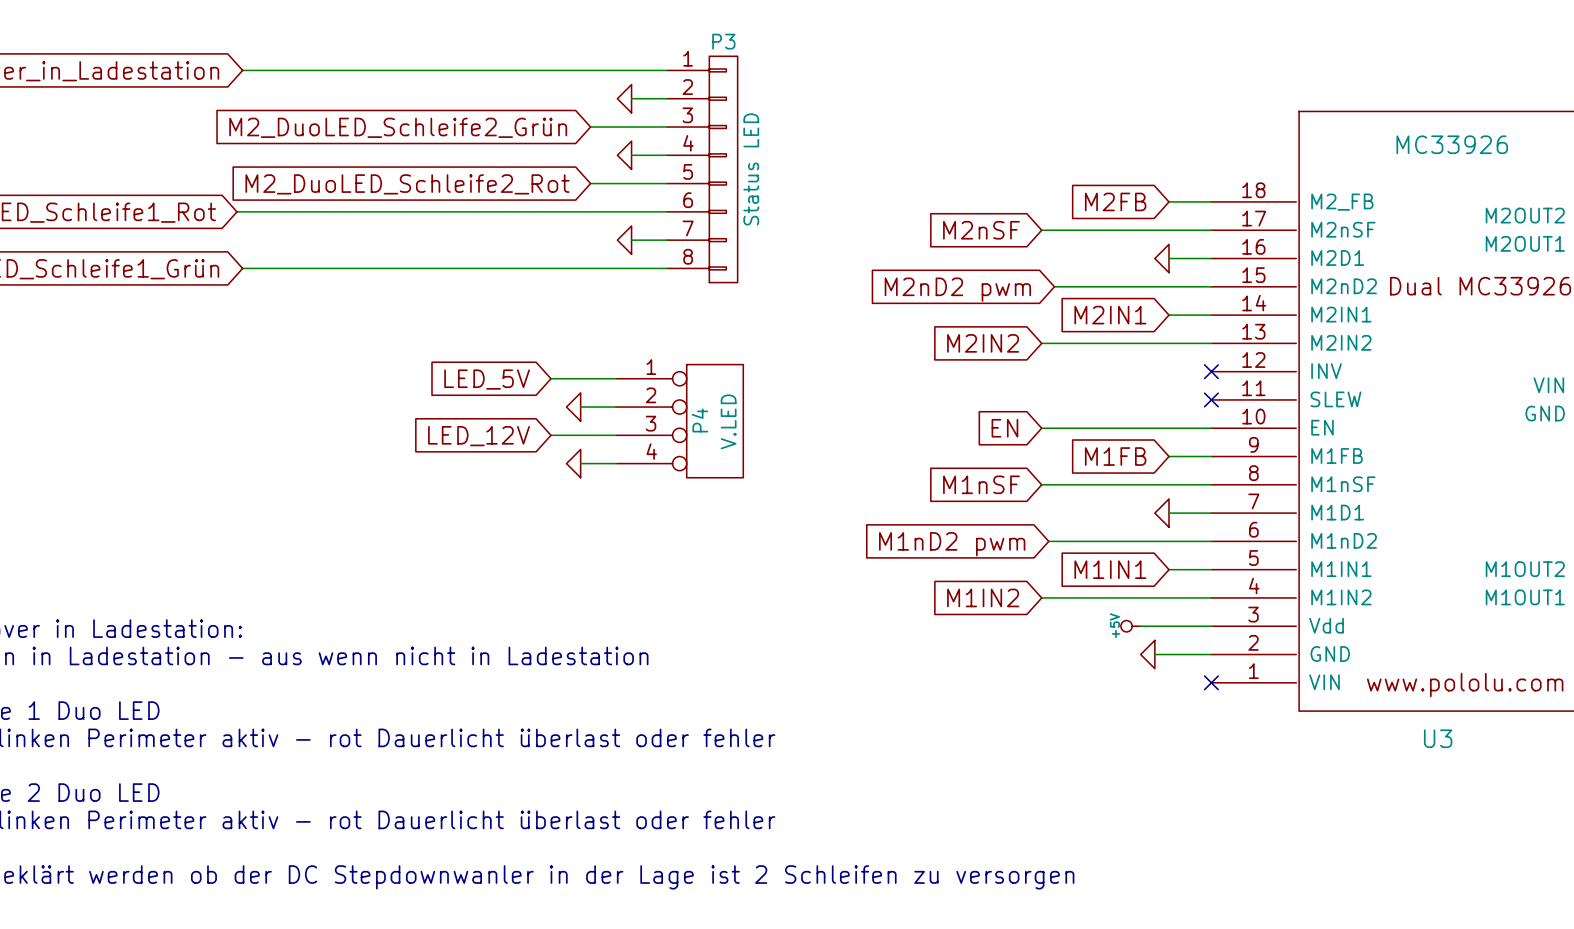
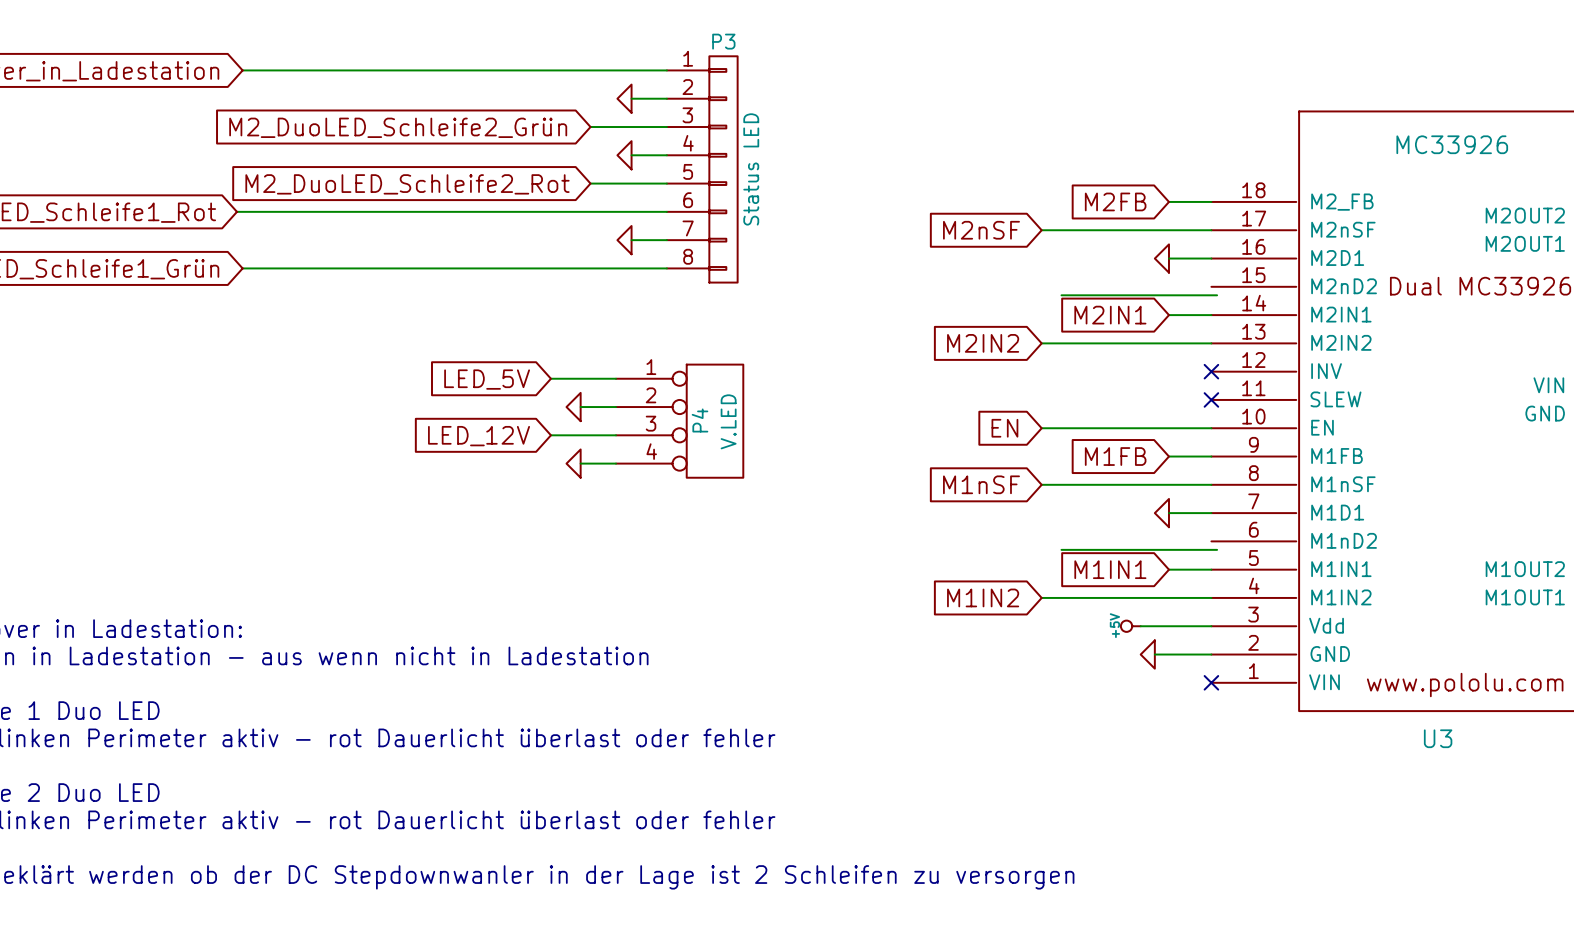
wire: (1054, 286) (1211, 286) -> none
global label: M2nD2 pwm (957, 289) -> none
wire: none -> (1061, 295) (1217, 295)
wire: (1048, 541) (1211, 541) -> none
global label: M1nD2 pwm (952, 544) -> none
wire: none -> (1061, 549) (1217, 549)

